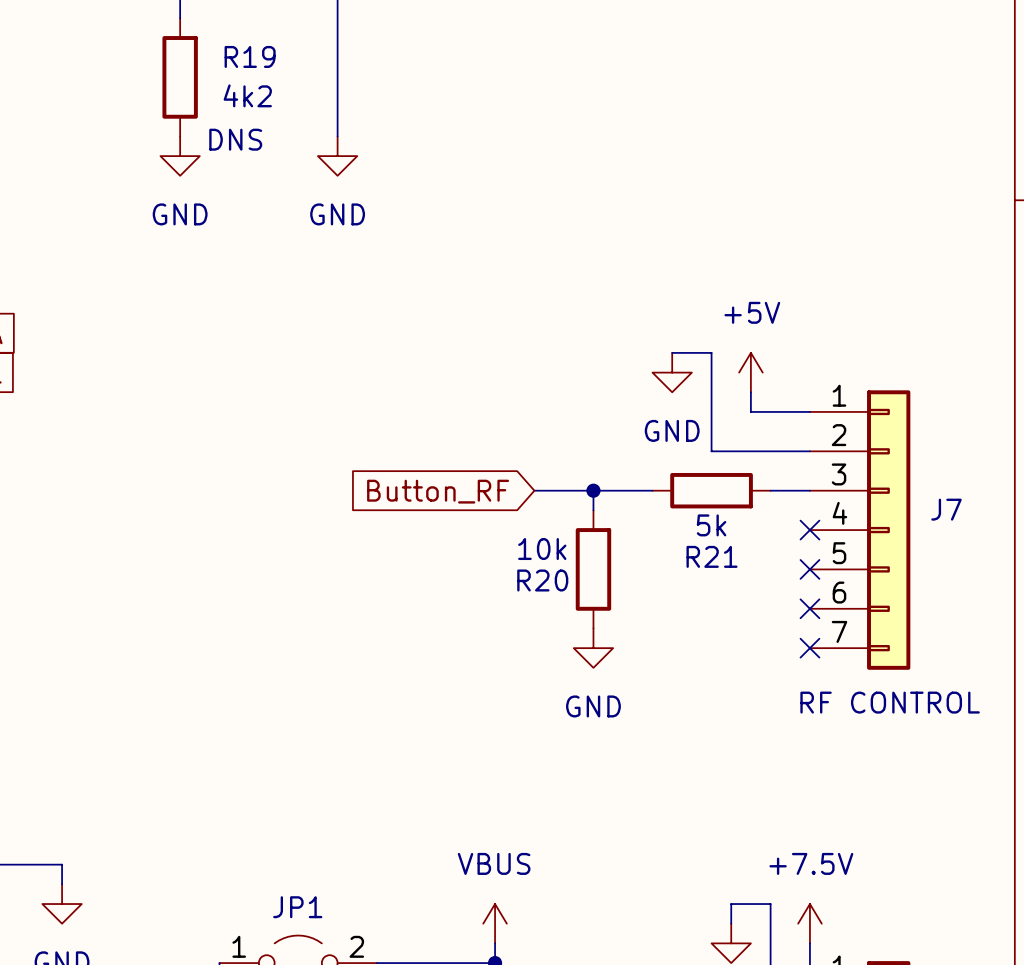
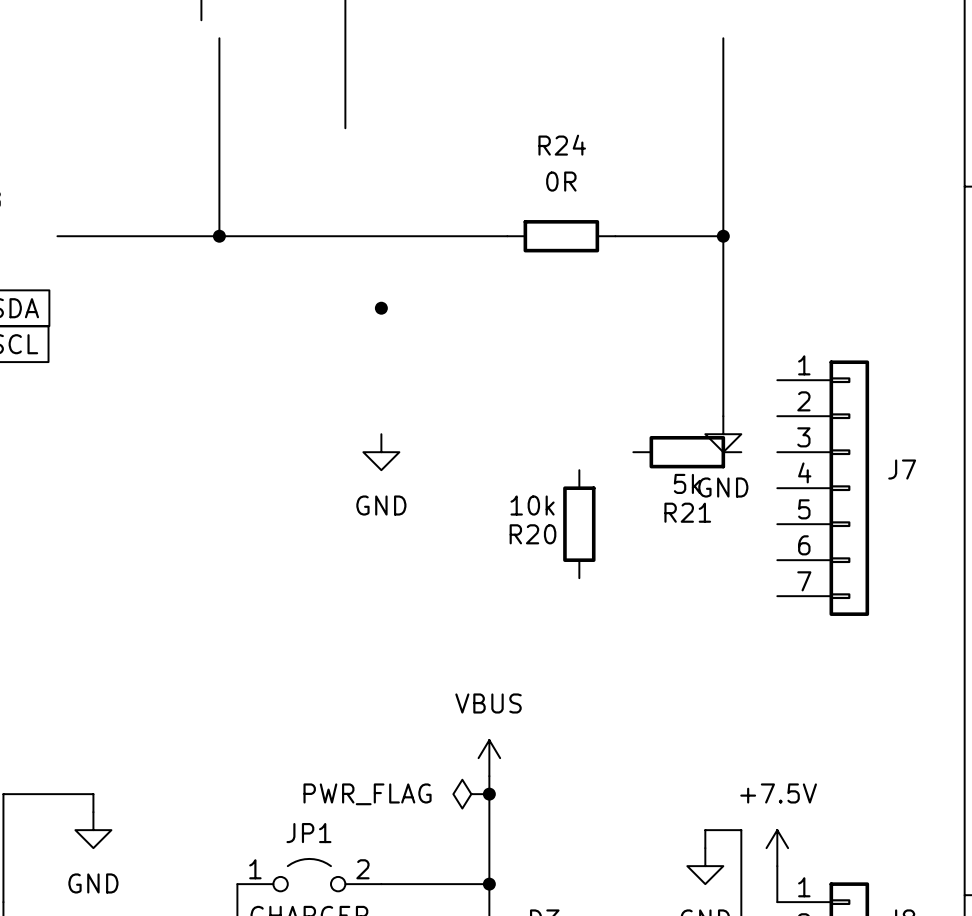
wire: none -> (219, 38) (219, 236)
wire: none -> (723, 38) (723, 362)
R19: 4k2 (180, 77) -> none
text: DNS (235, 139) -> none
power symbol: GND (180, 156) -> none
power symbol: GND (337, 156) -> none
wire: none -> (57, 236) (507, 236)
junction: none -> (219, 236)
R24: none -> 0R (561, 236)
junction: none -> (723, 236)
junction: none -> (381, 308)
wire: (672, 352) (711, 352) (711, 451) (809, 451) -> none
power symbol: GND (672, 372) -> none
power symbol: +5V (750, 372) -> none
wire: (750, 411) (809, 411) -> (723, 380) (723, 416)
power symbol: none -> GND (723, 434)
power symbol: none -> GND (381, 452)
wire: (534, 490) (652, 490) -> (615, 236) (723, 236)
wire: (593, 490) (593, 510) -> none
junction: (593, 490) -> none
wire: (770, 490) (809, 490) -> none
global label: Button_RF (438, 491) -> none
no-connect mark: (809, 530) -> none
no-connect mark: (809, 569) -> none
no-connect mark: (809, 608) -> none
power symbol: GND (593, 648) -> none
no-connect mark: (809, 648) -> none
text: RF CONTROL (890, 702) -> none
wire: none -> (489, 776) (489, 866)
power symbol: none -> PWR_FLAG (471, 794)
junction: none -> (489, 794)
power symbol position: VBUS (495, 923) -> VBUS (489, 758)

